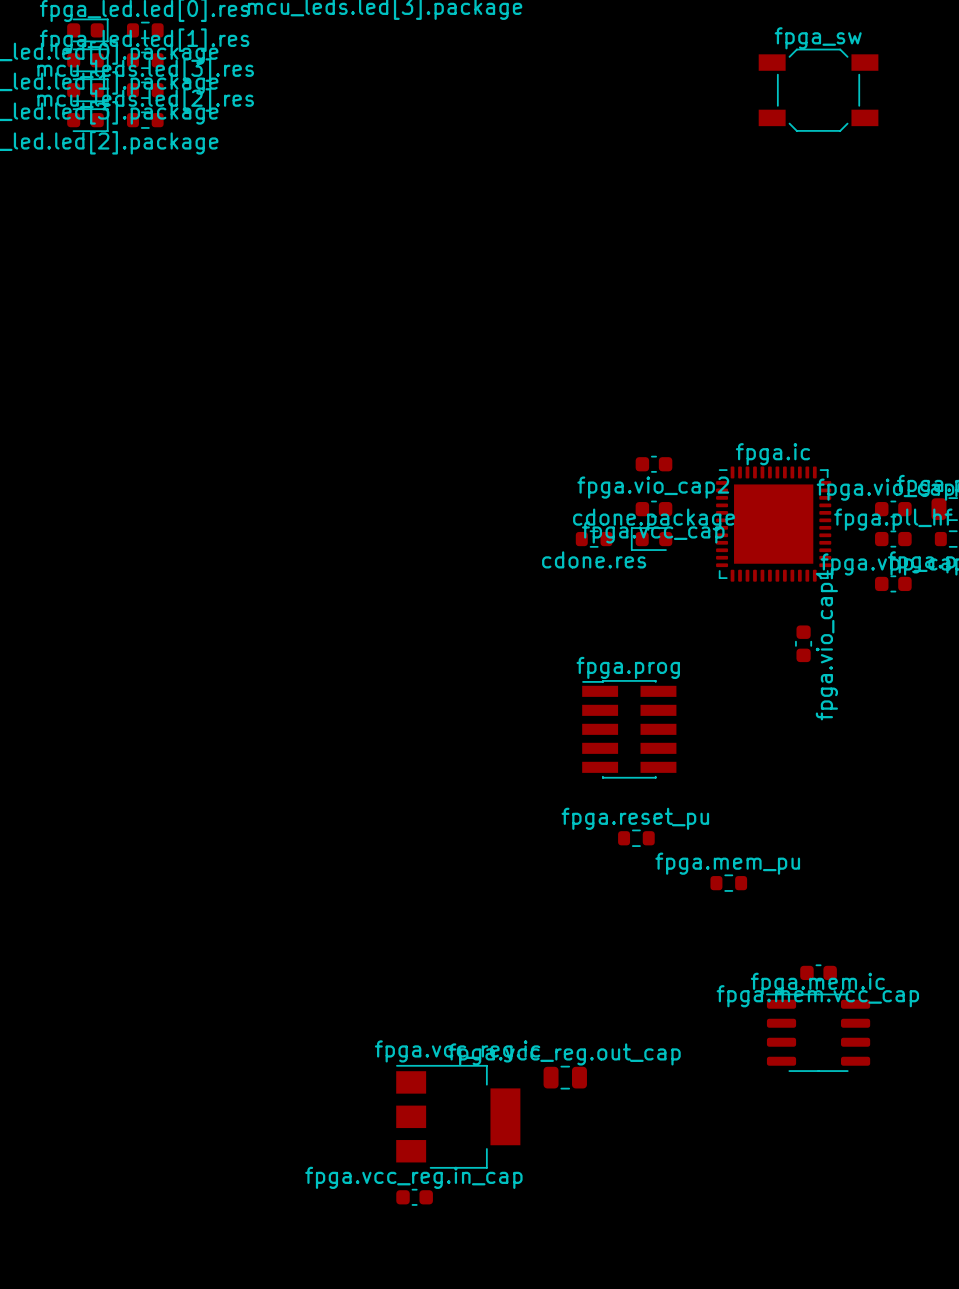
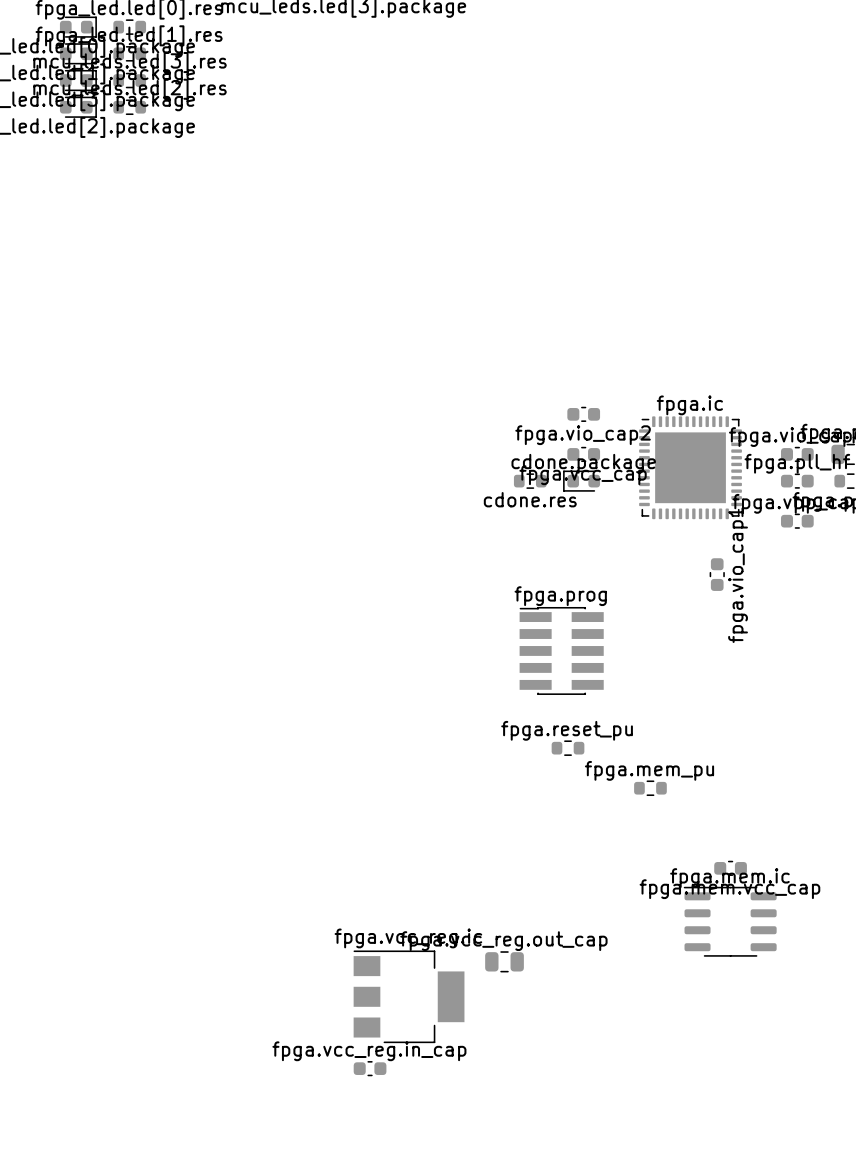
fpga_sw: (818, 90) -> none

